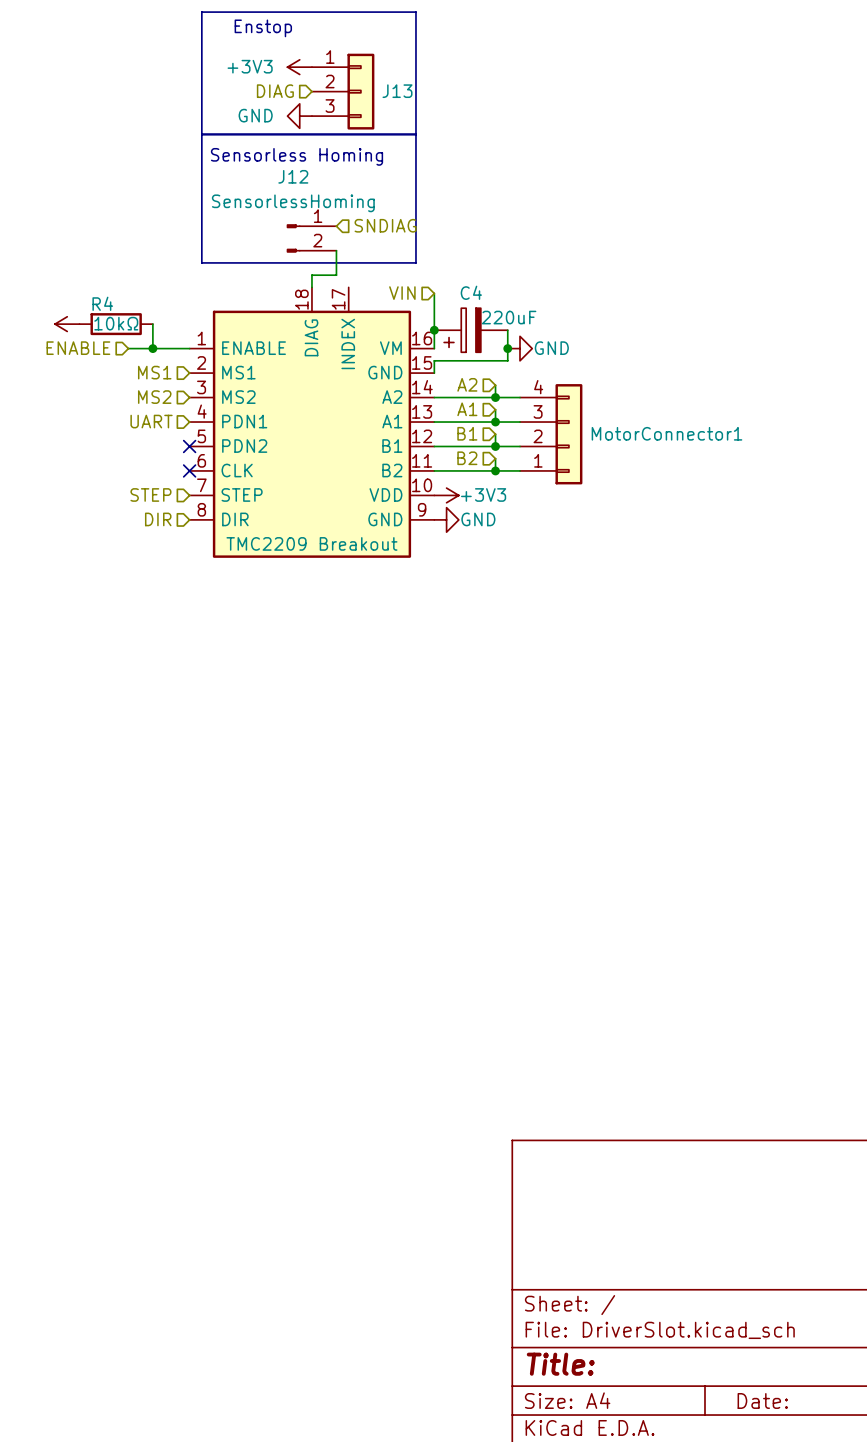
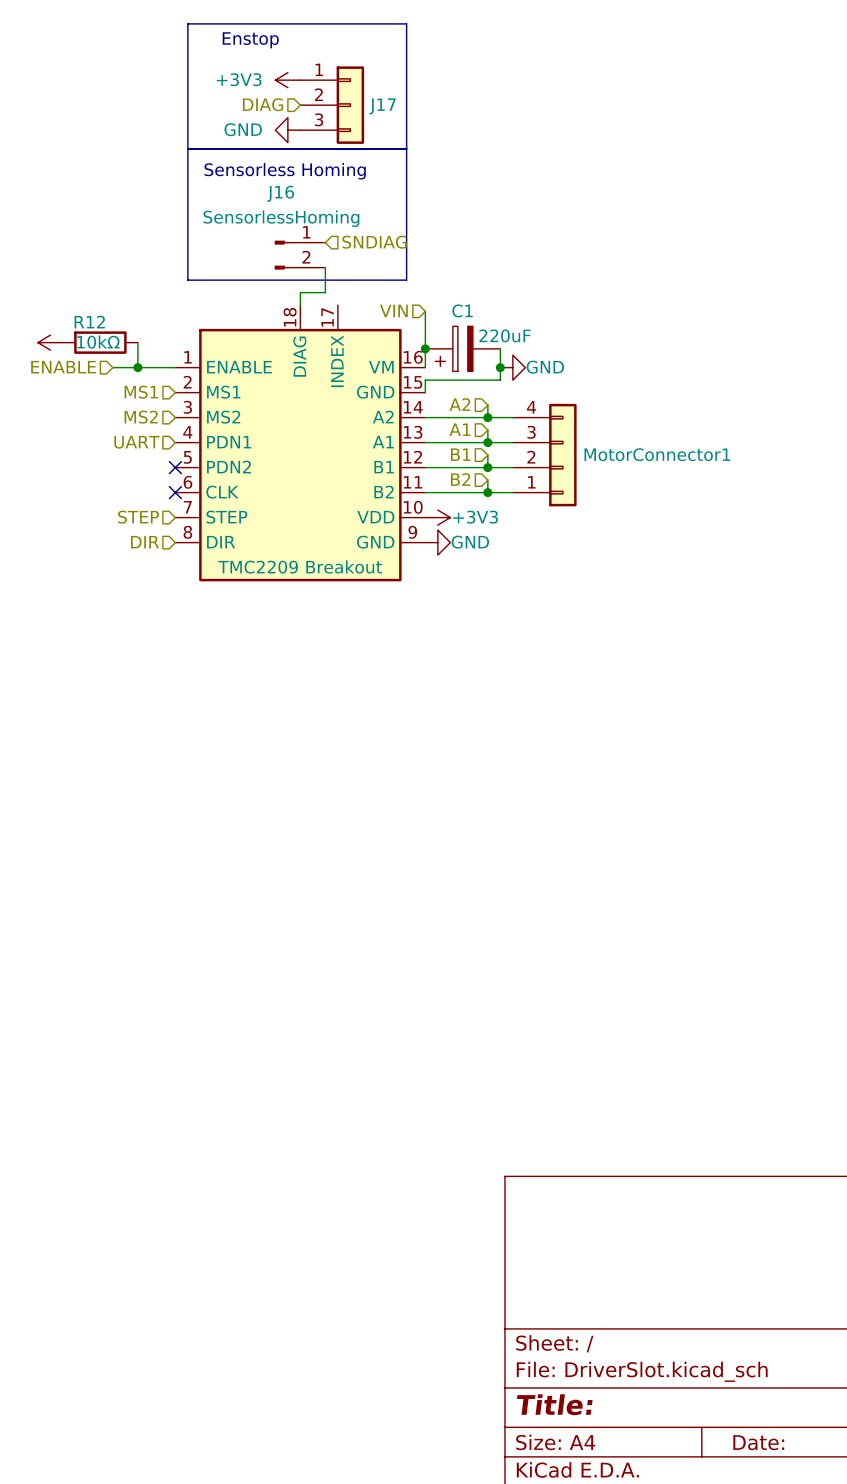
J13 name: J13 (397, 91) -> J17 (382, 106)
J12 name: J12 (293, 176) -> J16 (280, 193)
C4 name: C4 (471, 292) -> C1 (462, 310)
R4 name: R4 (102, 303) -> R12 (89, 322)

